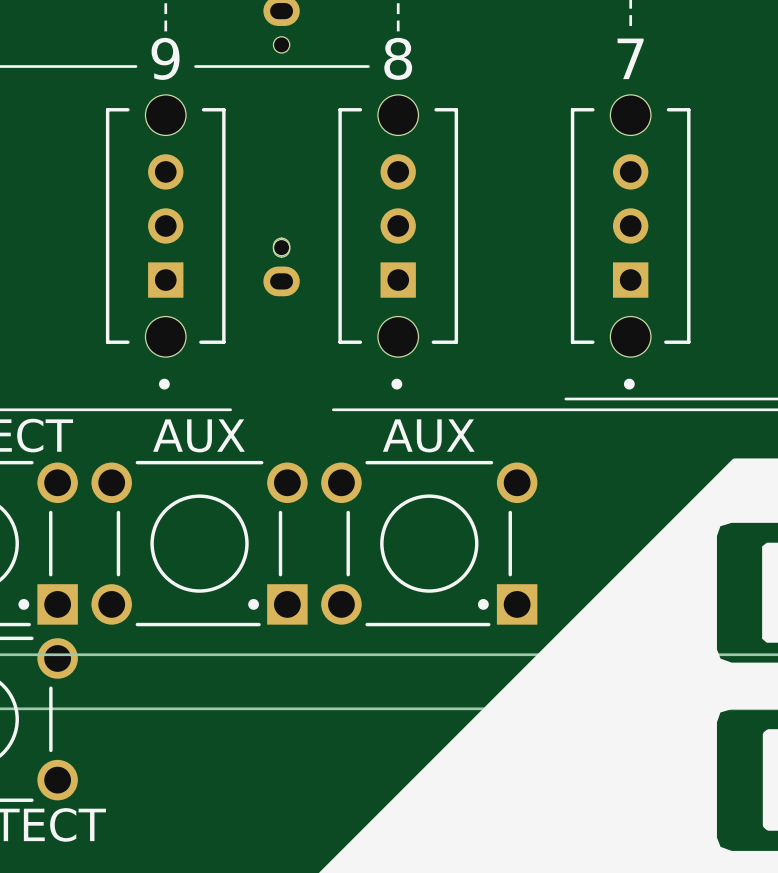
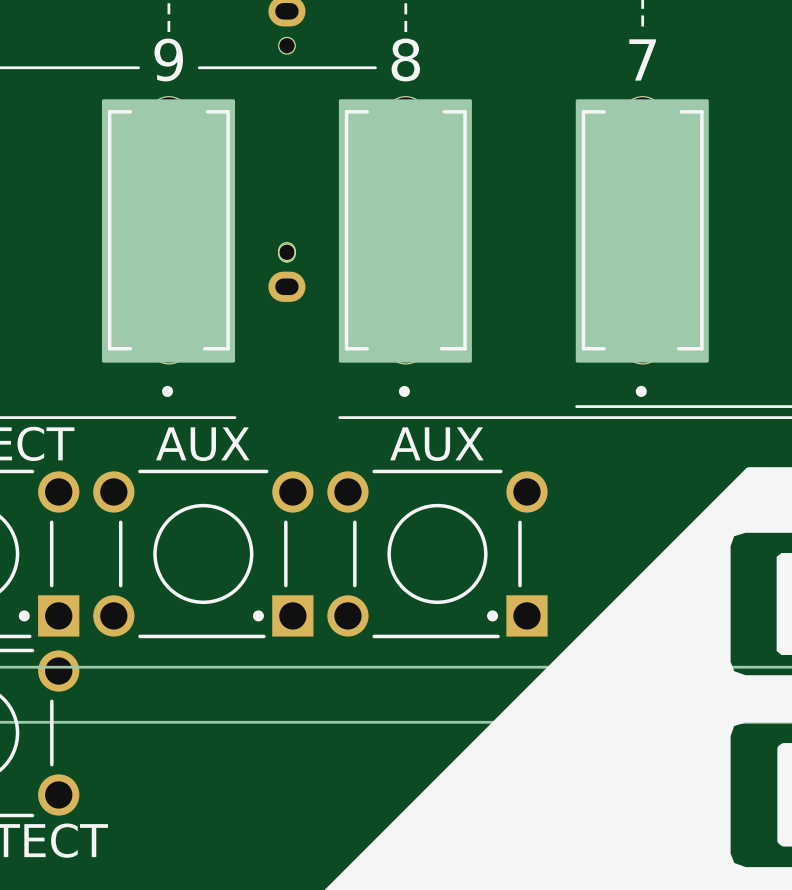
drawing: none -> [101, 99, 236, 363]
drawing: none -> [338, 99, 472, 363]
drawing: none -> [575, 99, 709, 363]

